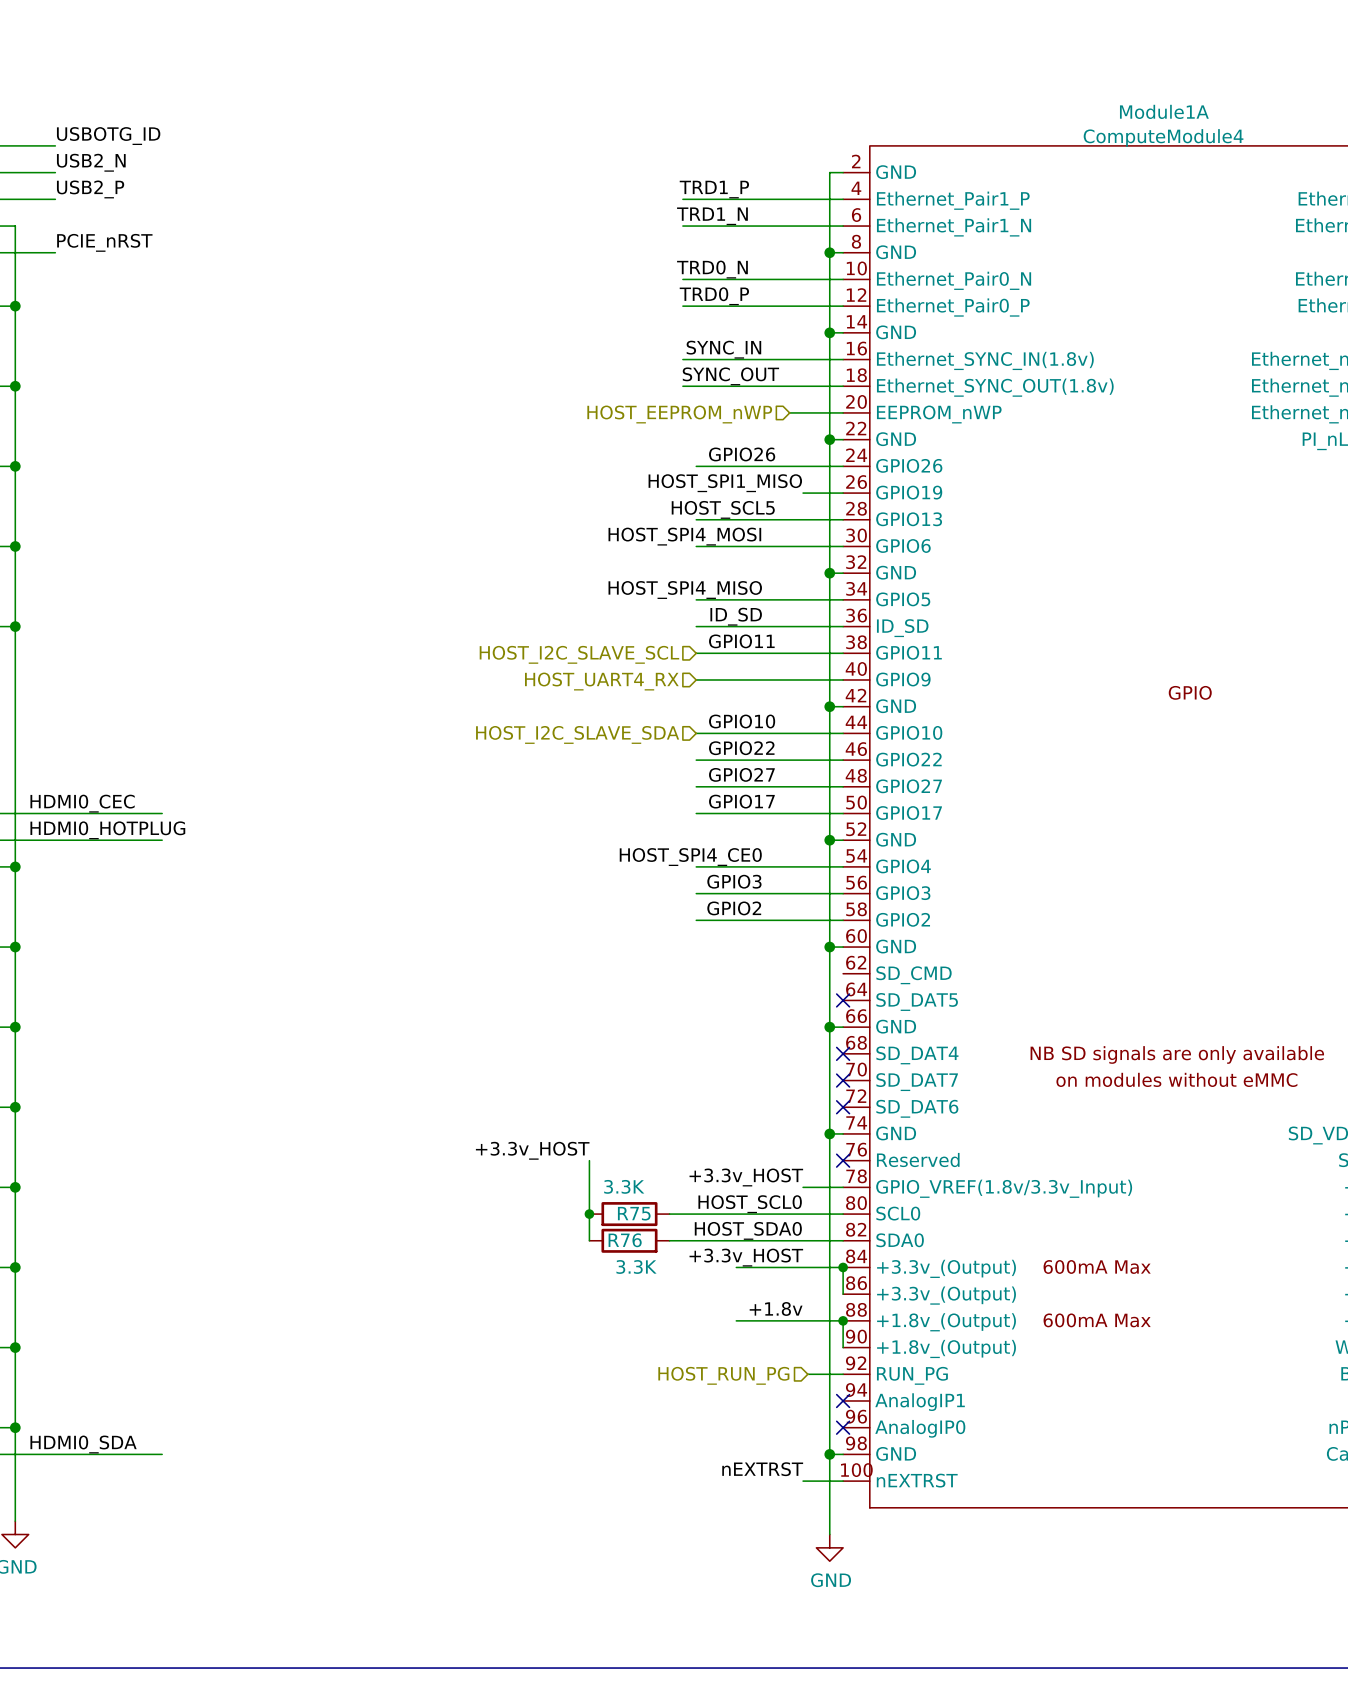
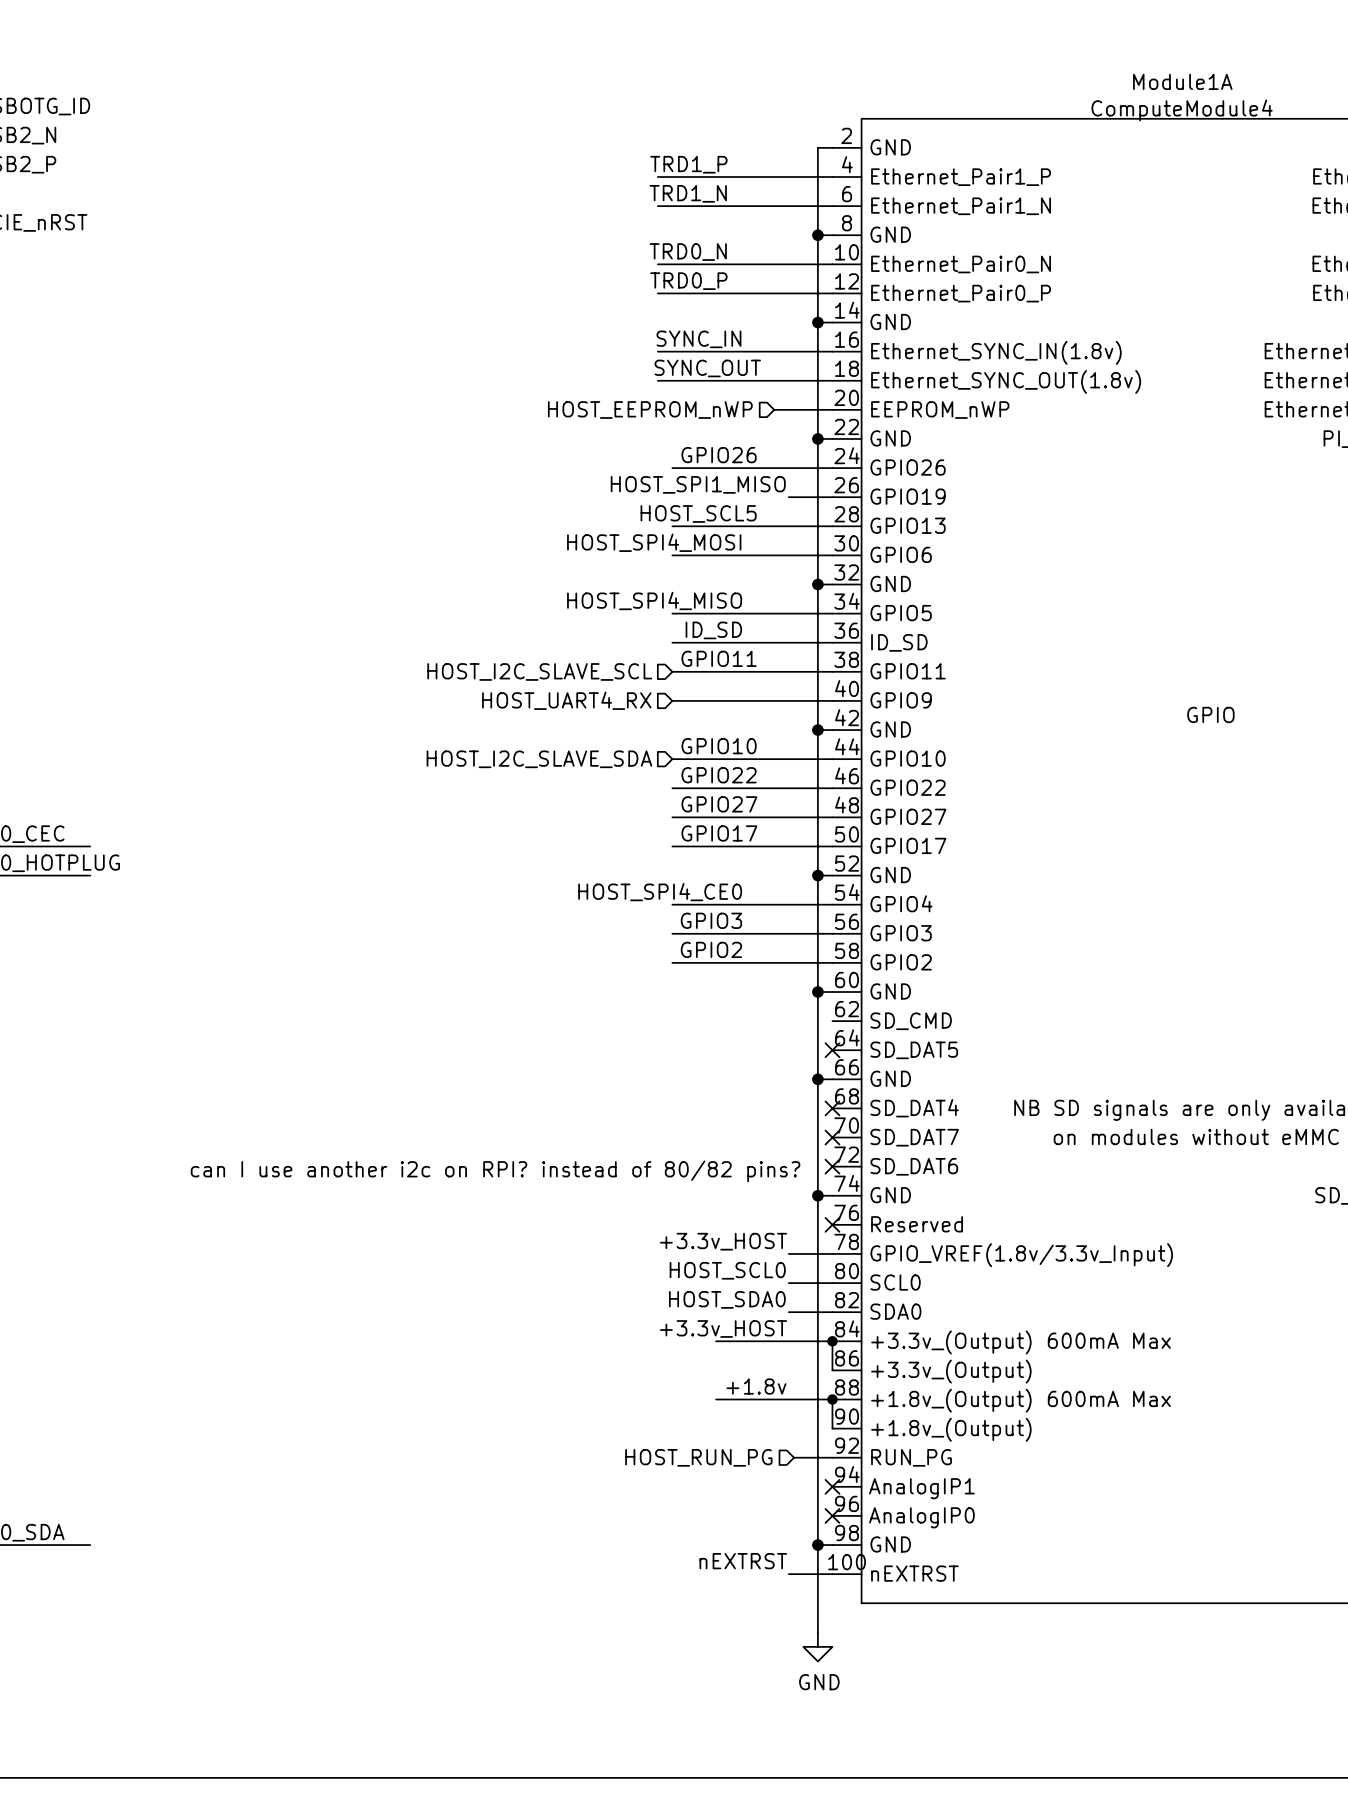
text: none -> can I use another i2c on RPI? instead of 80/82 pins? (495, 1171)
label: +3.3v_HOST (532, 1150) -> none
wire: (589, 1160) (589, 1240) -> none
junction: (589, 1214) -> none
R75: 3.3K (629, 1214) -> none
wire: (669, 1214) (803, 1214) -> none
R76: 3.3K (629, 1240) -> none
wire: (669, 1240) (803, 1240) -> none

